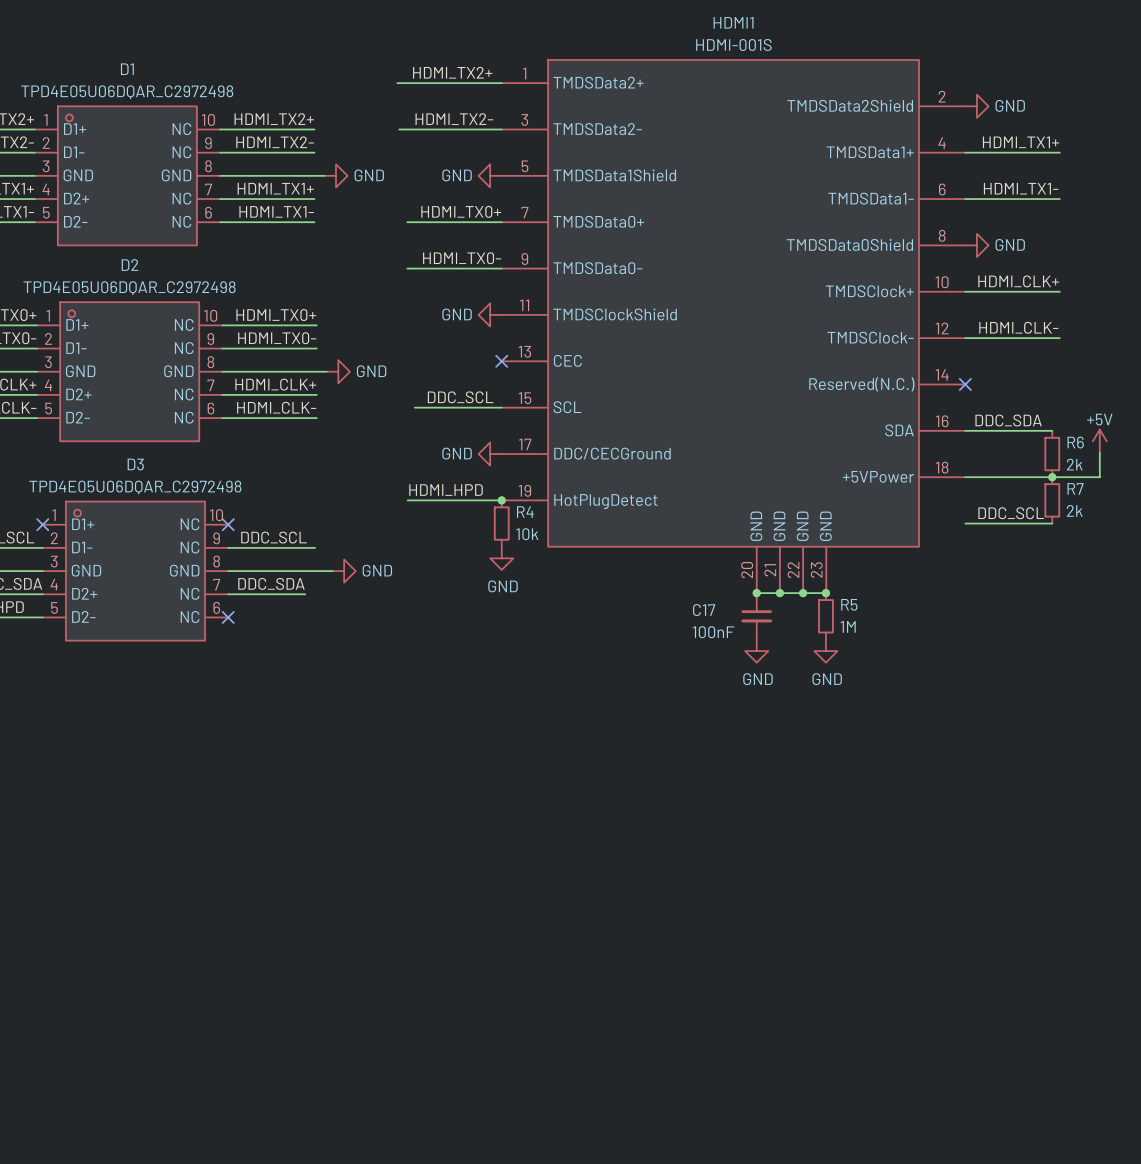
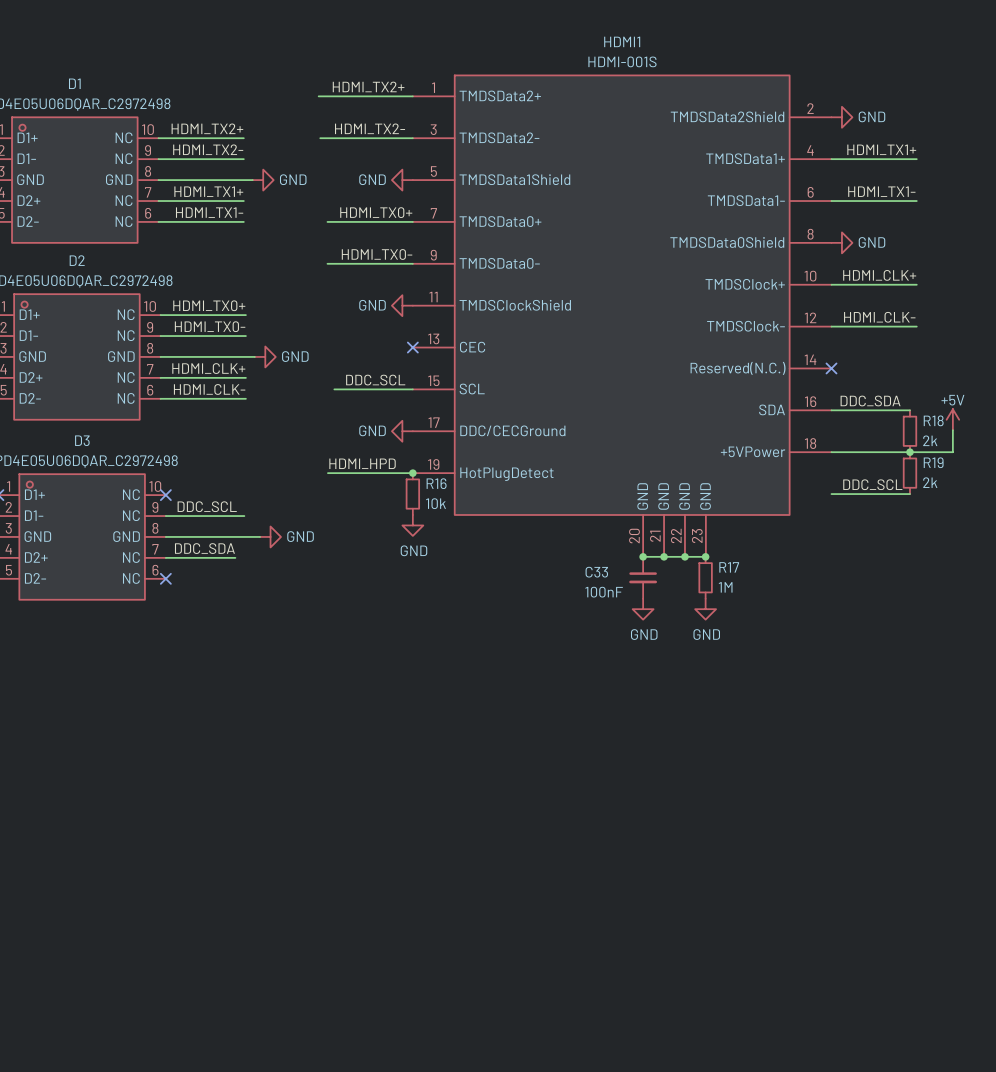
R6 name: R6 (1075, 442) -> R18 (933, 420)
R7 name: R7 (1075, 488) -> R19 (933, 462)
R4 name: R4 (525, 512) -> R16 (436, 483)
R5 name: R5 (849, 604) -> R17 (729, 567)
C17 name: C17 (704, 610) -> C33 (596, 572)

